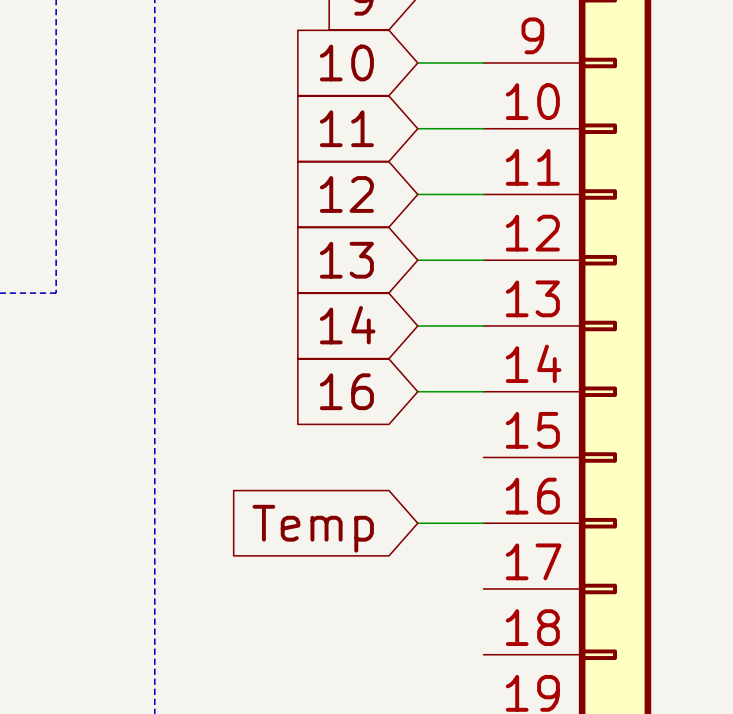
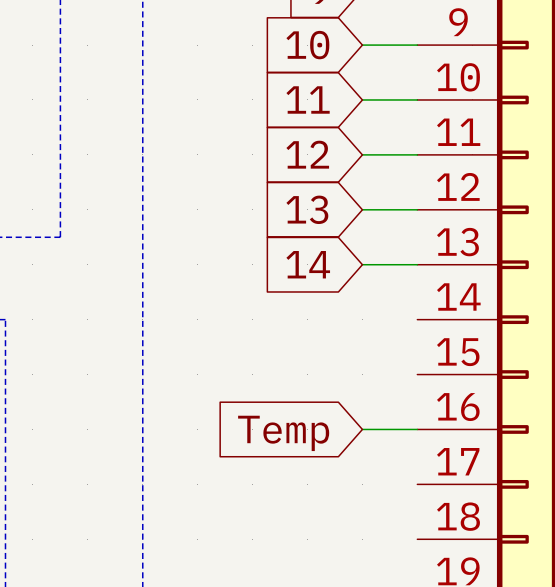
global label: 16 (346, 391) -> none
wire: (417, 391) (483, 391) -> none

